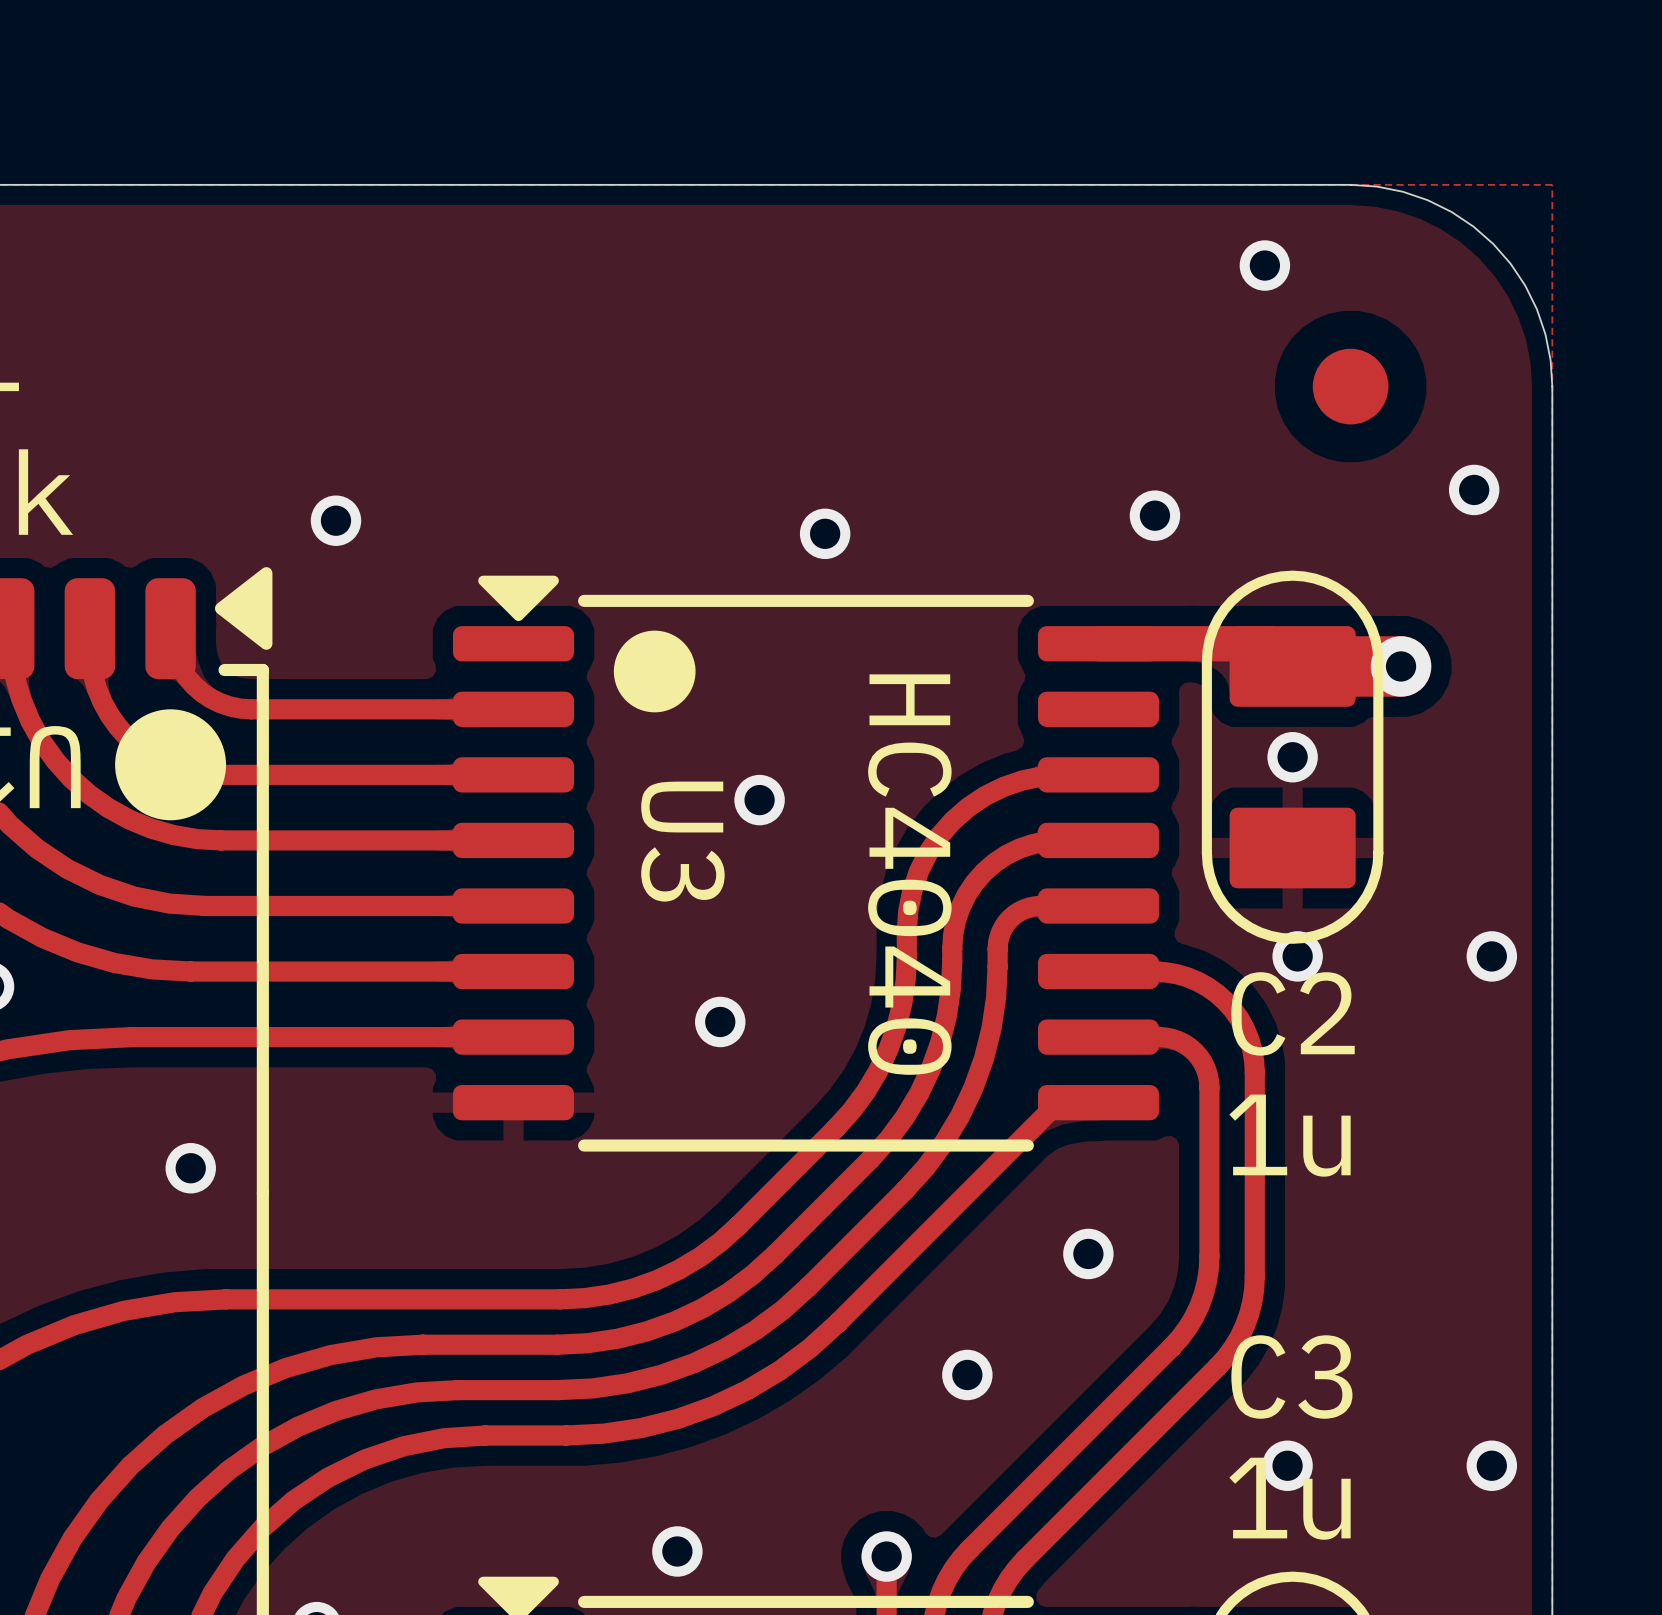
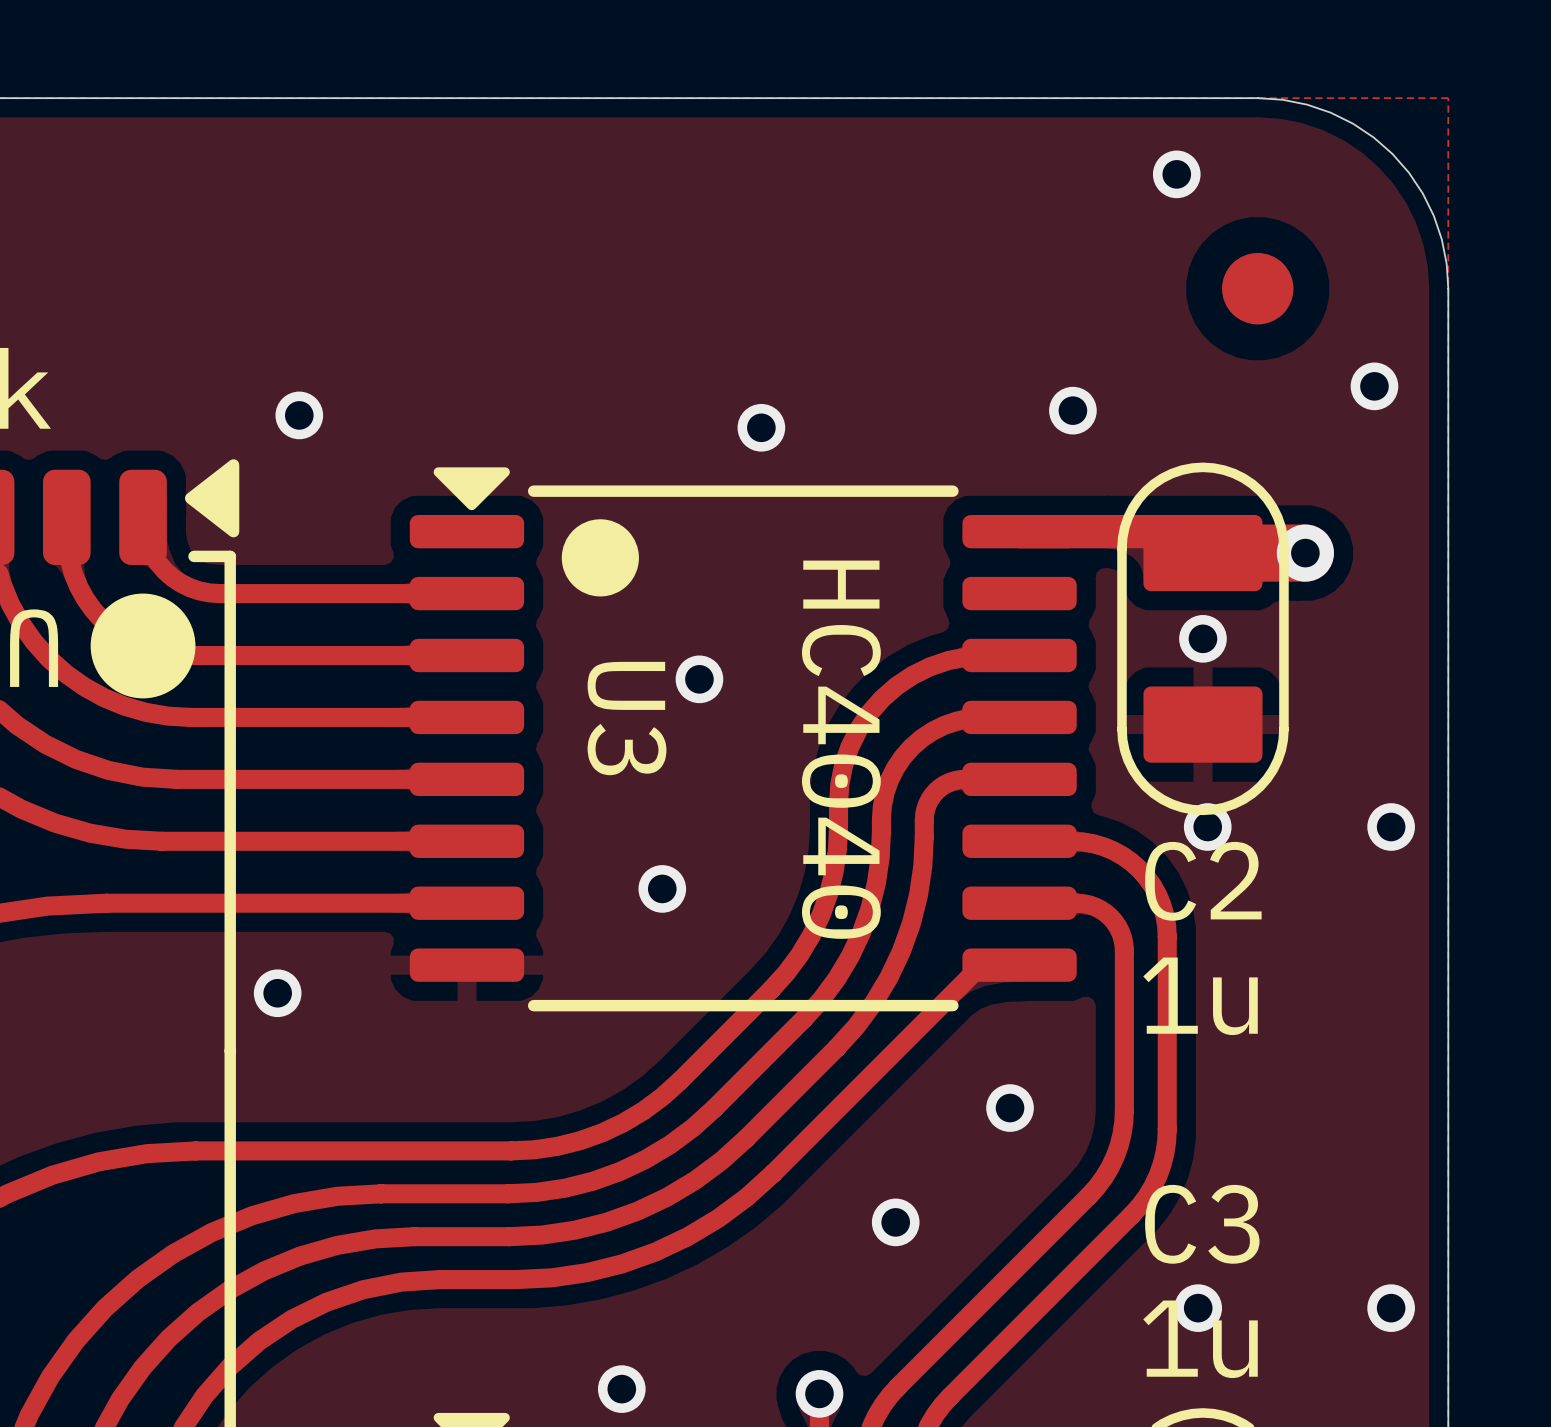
via position: (190, 1168) -> (277, 993)

